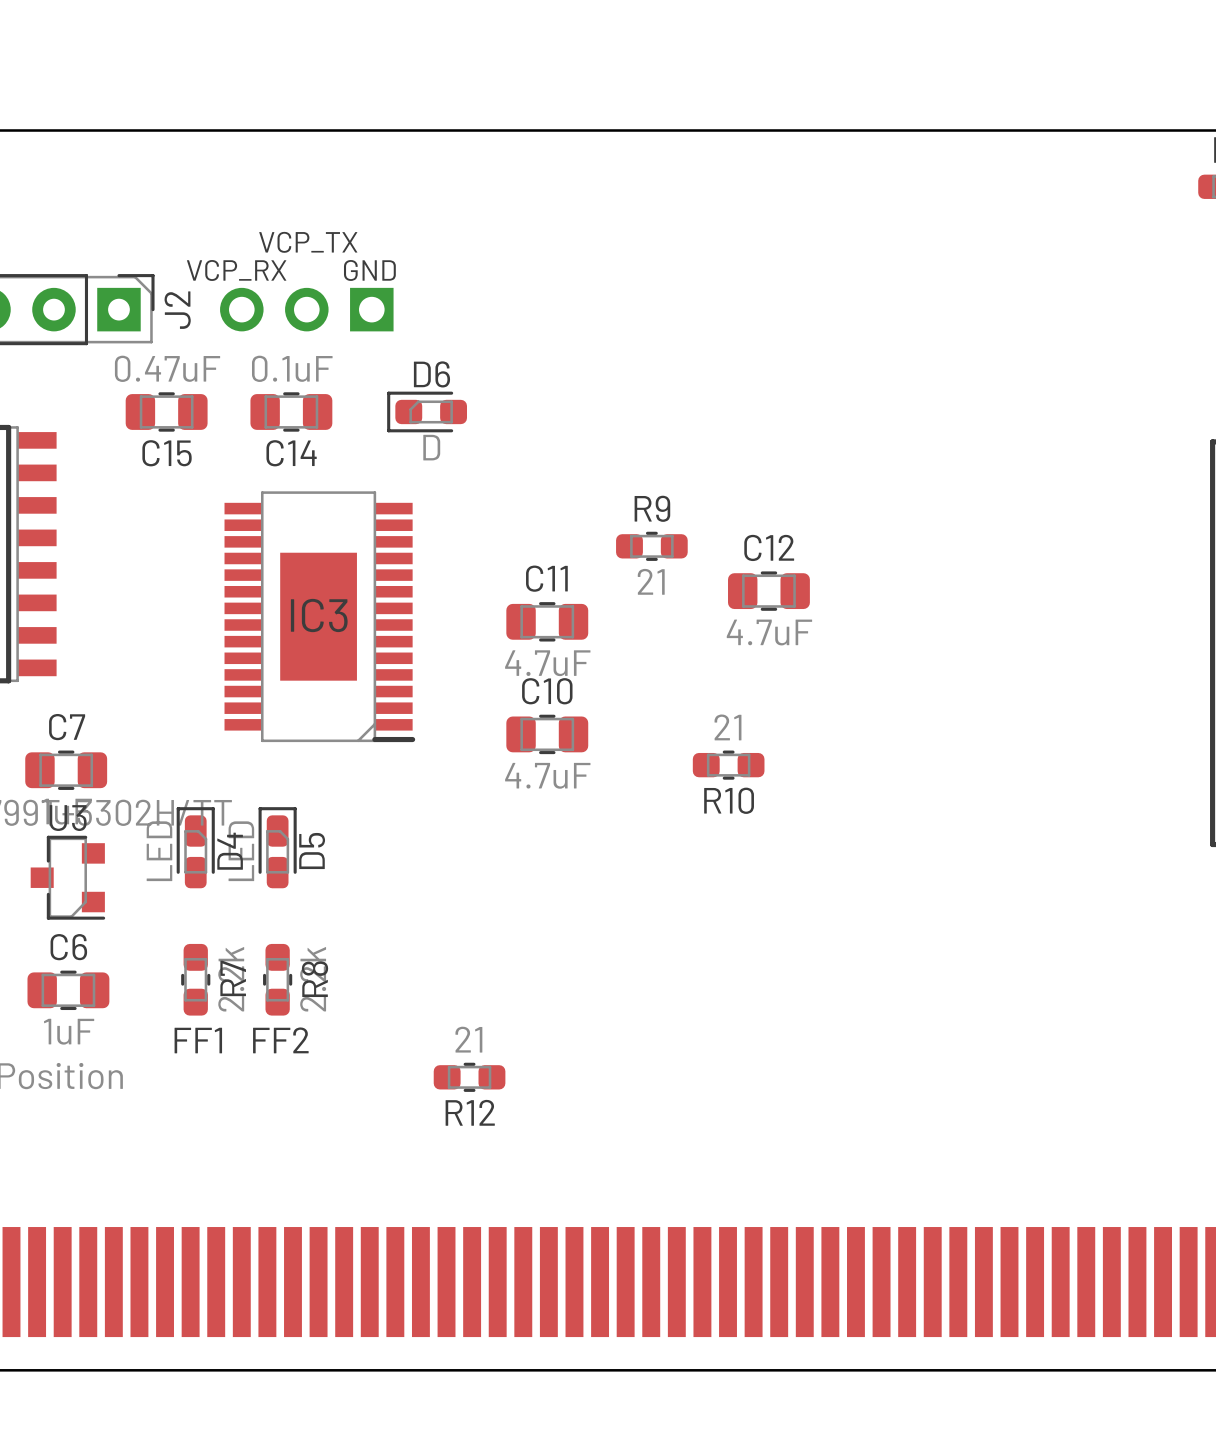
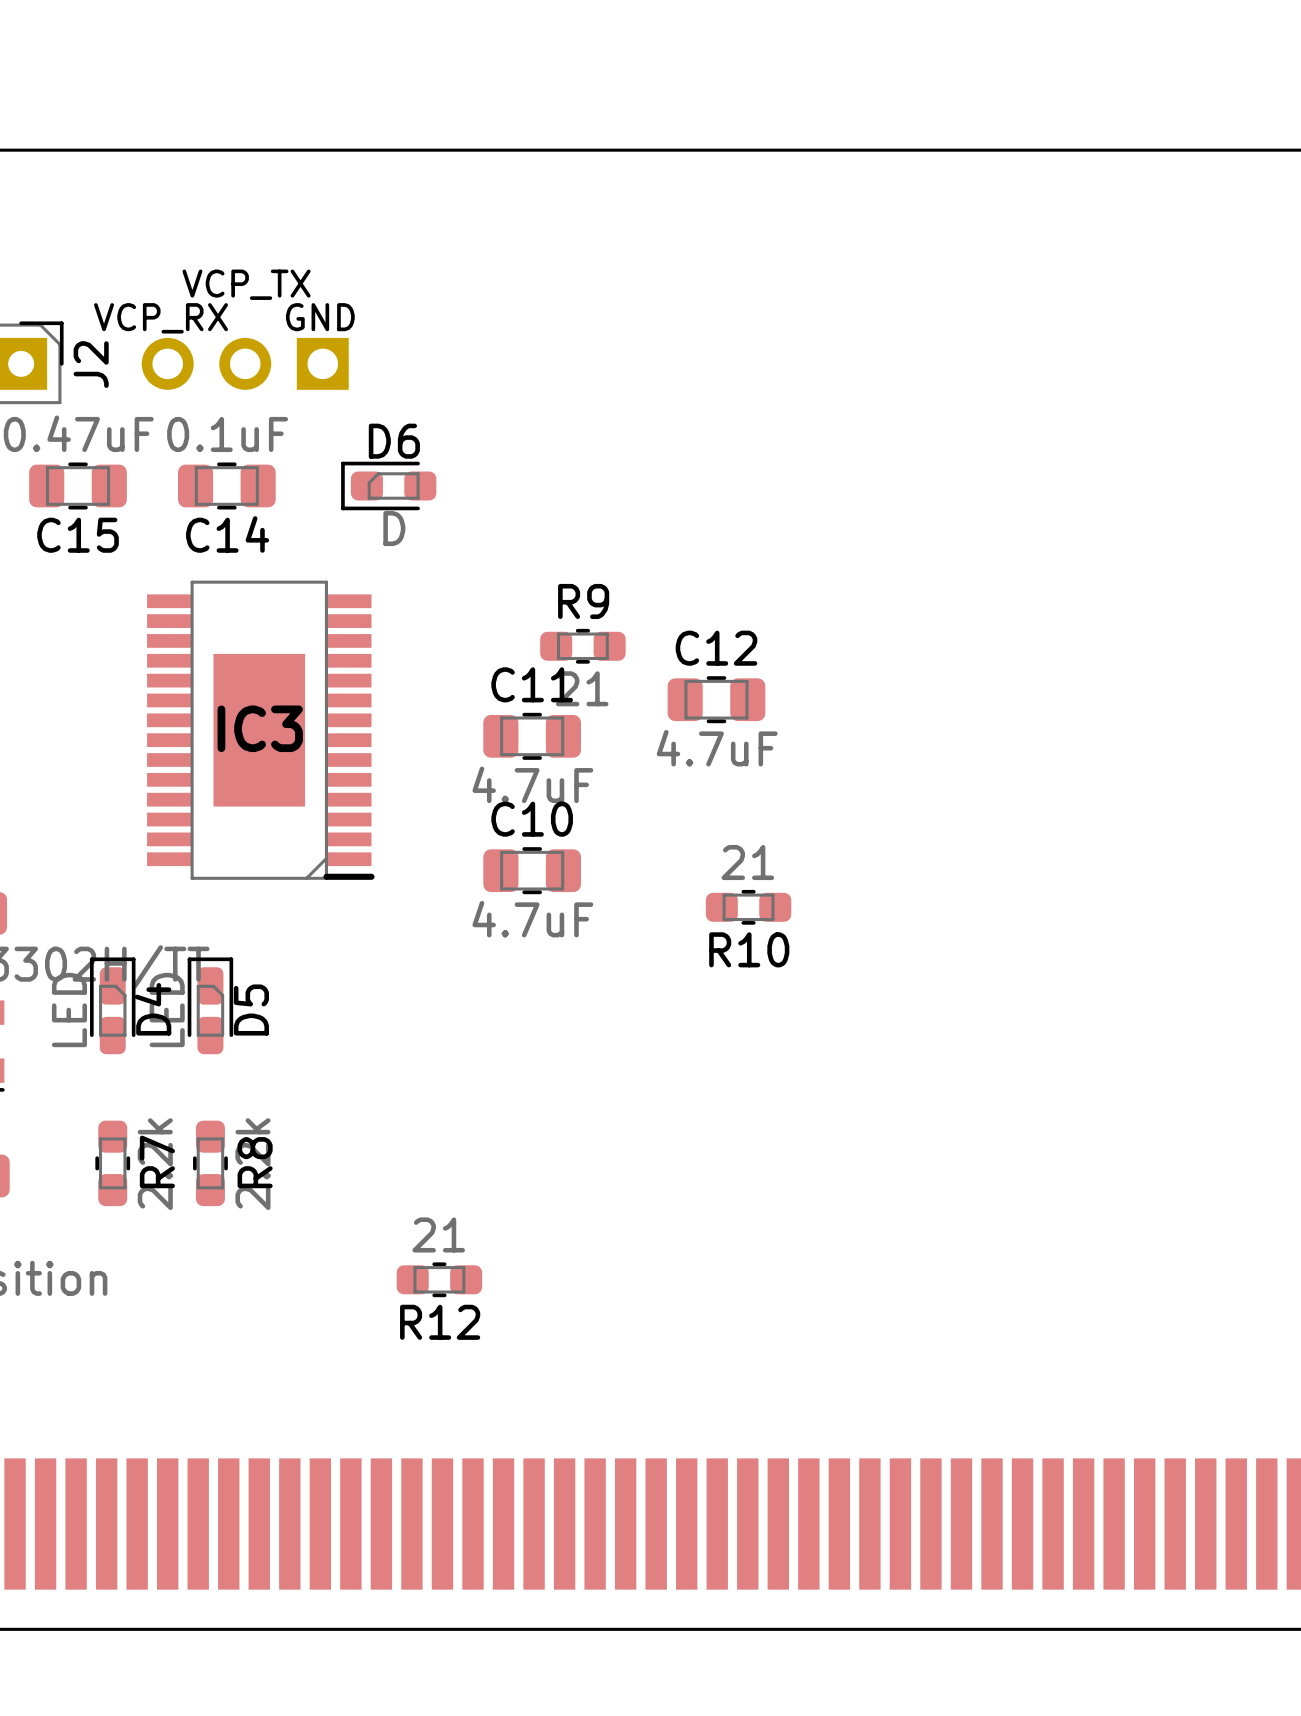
R9 position: (651, 546) -> (582, 646)
C12 position: (768, 591) -> (716, 699)
text: FF1 (198, 1040) -> none
text: FF2 (280, 1040) -> none

